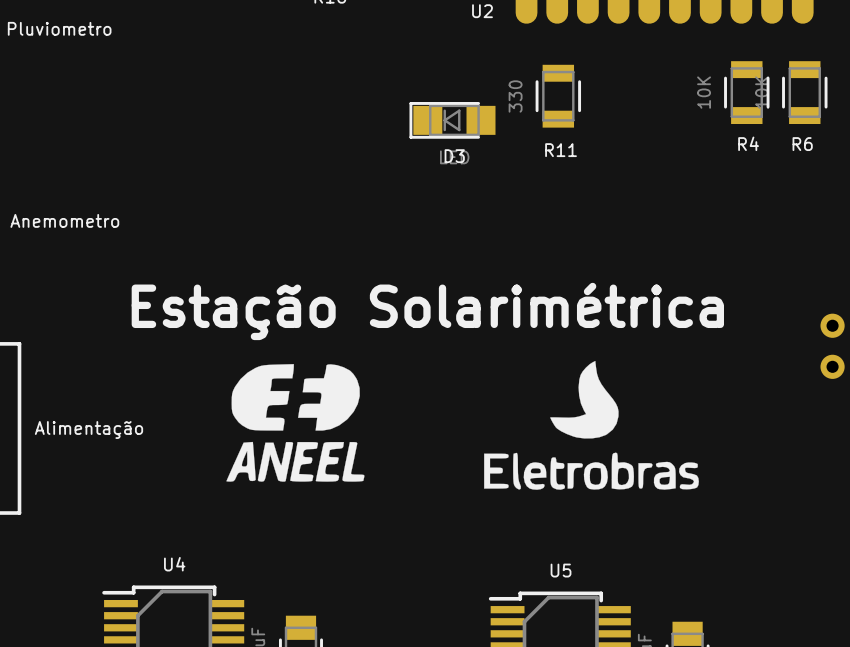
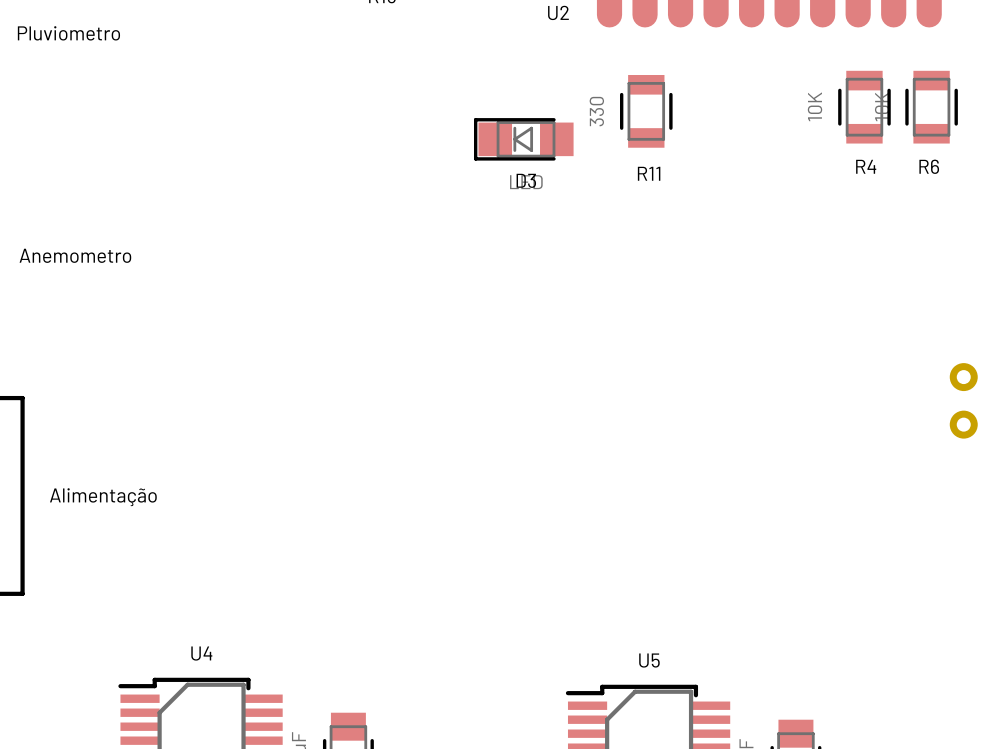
text: Estação Solarimétrica (427, 311) -> none
drawing: [484, 360, 699, 490] -> none
drawing: [226, 364, 365, 482] -> none

